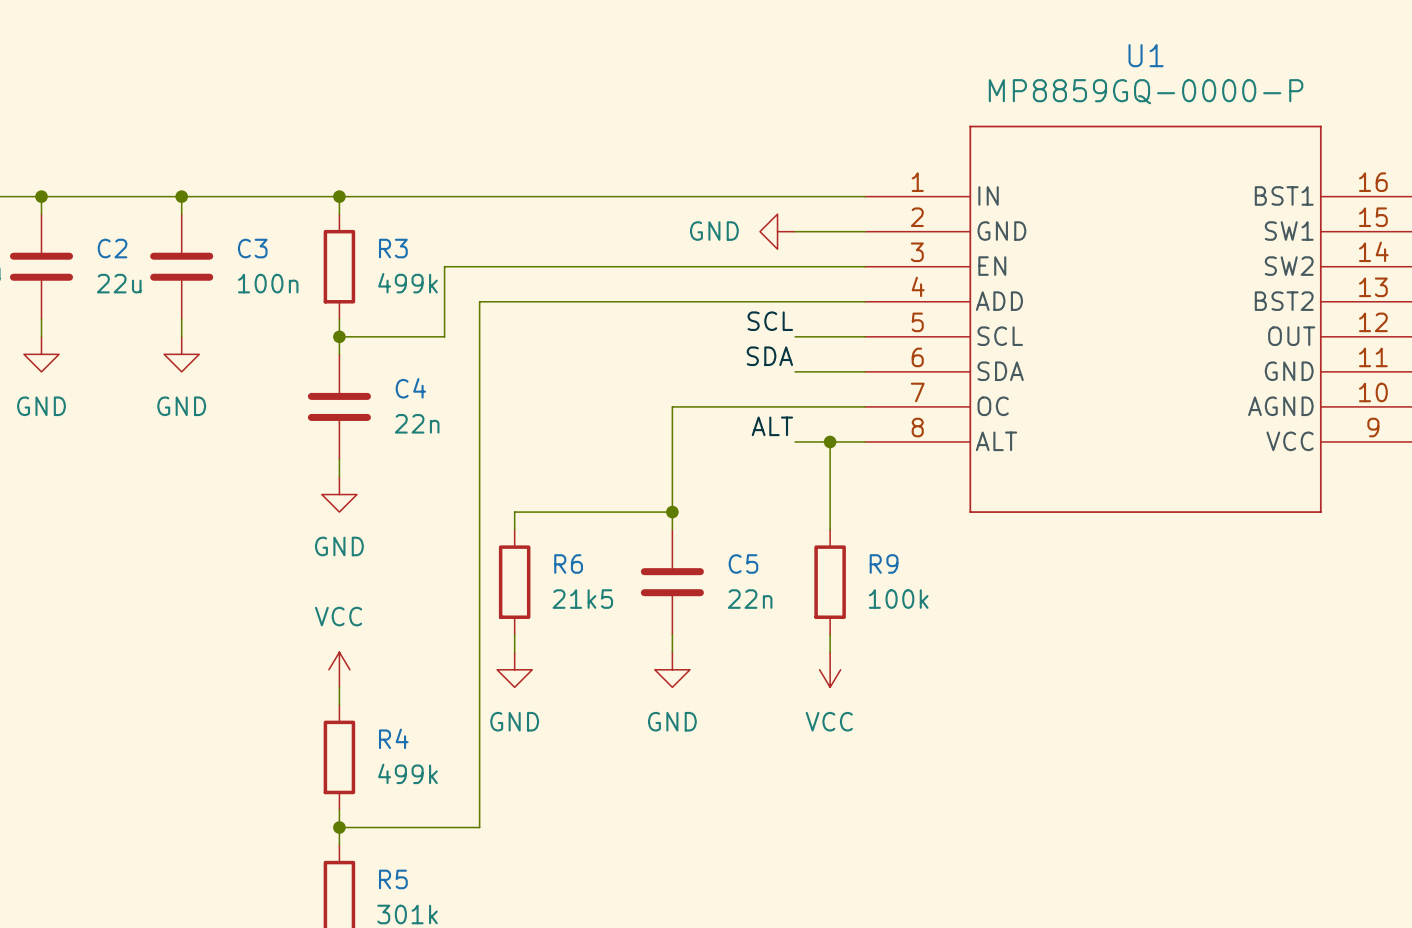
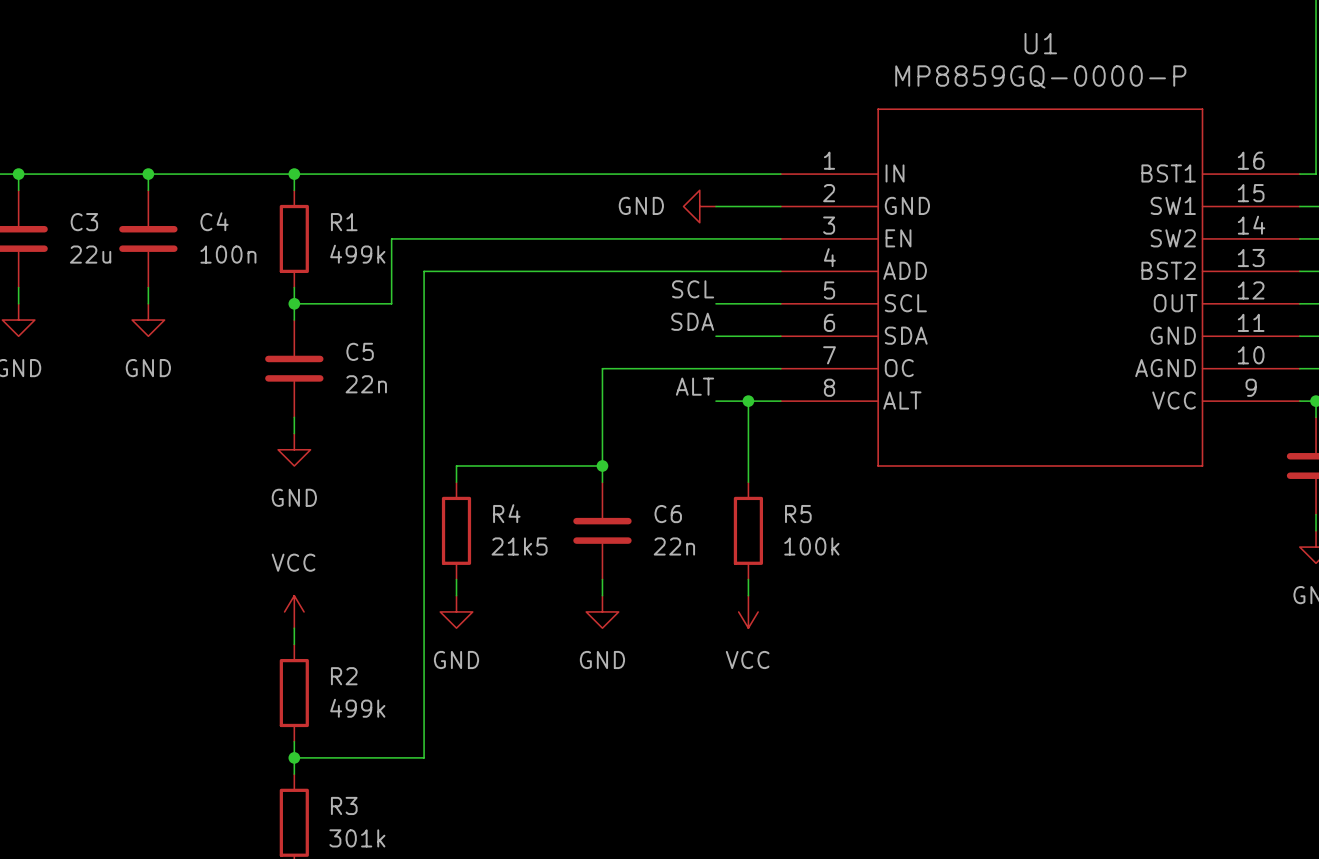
C2 name: C2 (112, 248) -> C3 (84, 222)
C3 name: C3 (252, 248) -> C4 (214, 221)
R3 name: R3 (393, 248) -> R1 (344, 222)
C4 name: C4 (410, 388) -> C5 (360, 351)
R6 name: R6 (568, 563) -> R4 (506, 513)
C5 name: C5 (743, 563) -> C6 (668, 514)
R9 name: R9 (884, 563) -> R5 (798, 514)
R4 name: R4 (393, 738) -> R2 (344, 676)
R5 name: R5 (393, 879) -> R3 (344, 805)

